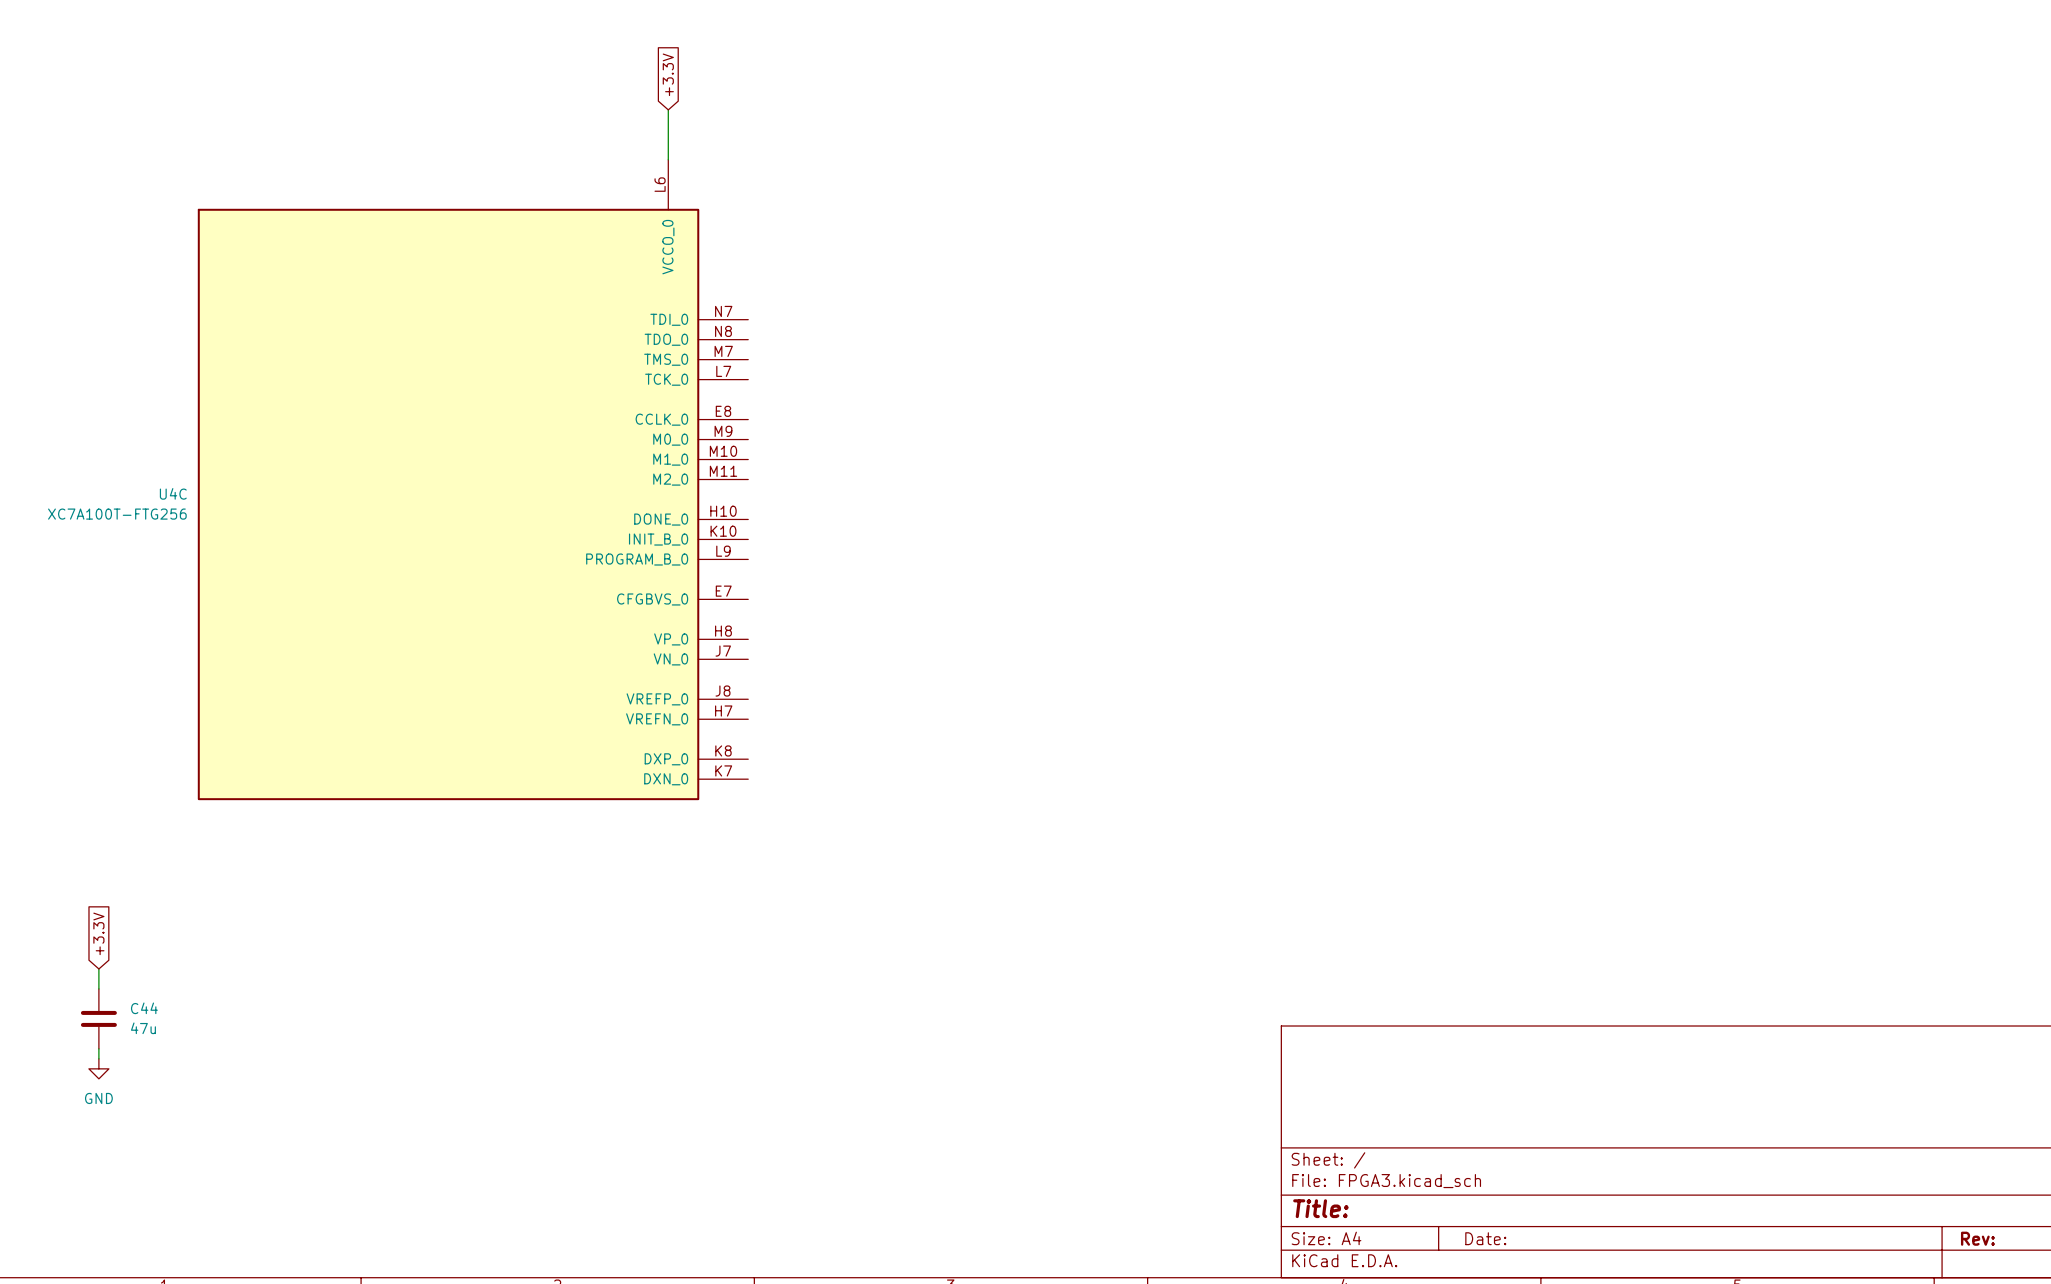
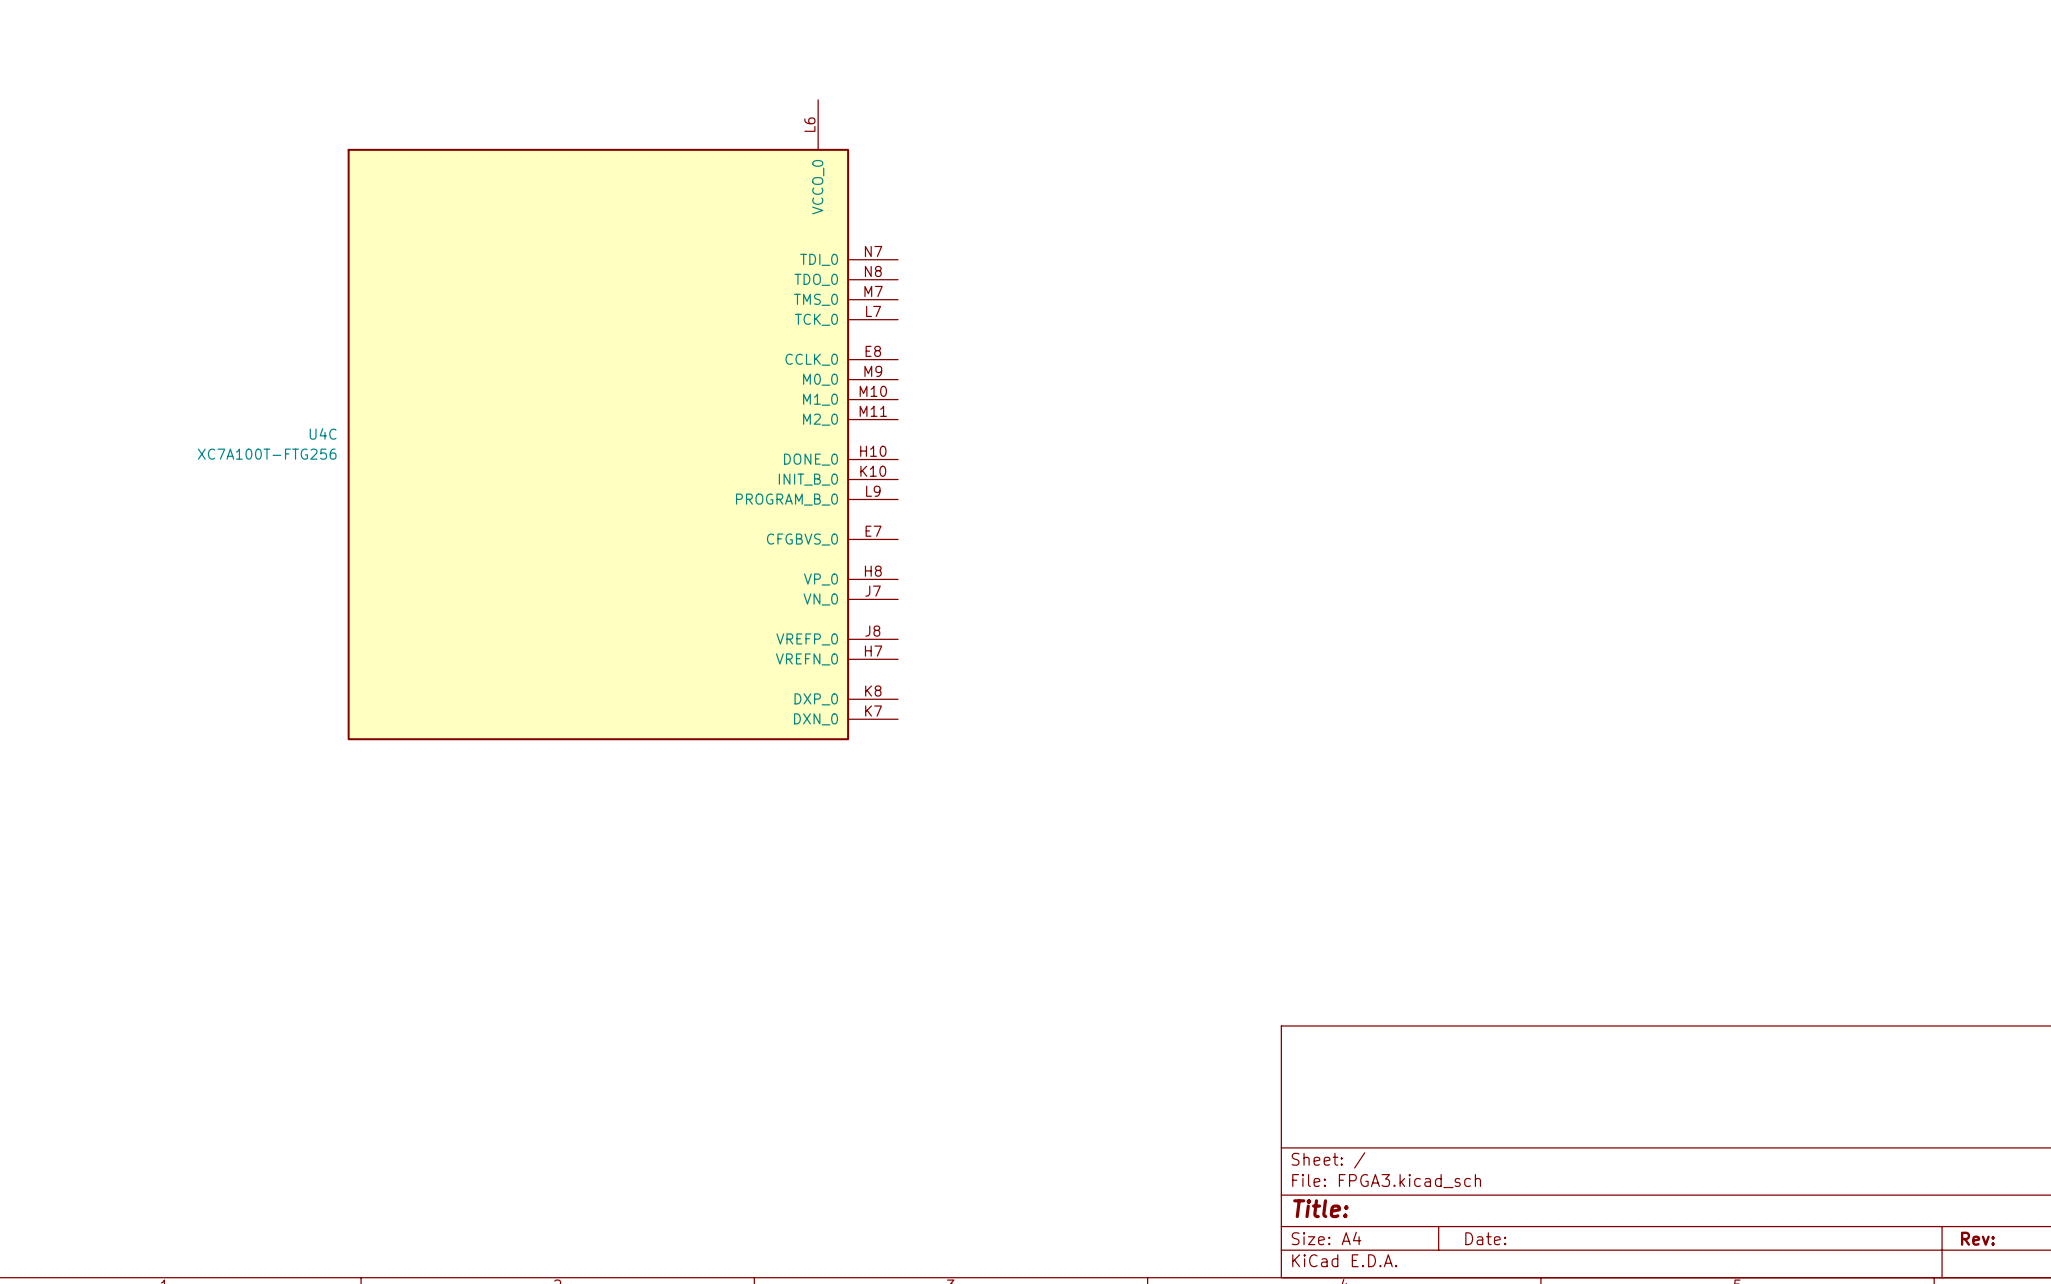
global label: +3.3V (668, 74) -> none
wire: (668, 109) (668, 159) -> none
U4C position: (473, 480) -> (622, 420)
global label: +3.3V (98, 933) -> none
wire: (98, 968) (98, 988) -> none
C44: 47u (98, 1018) -> none
wire: (98, 1048) (98, 1058) -> none
power symbol: GND (98, 1068) -> none

